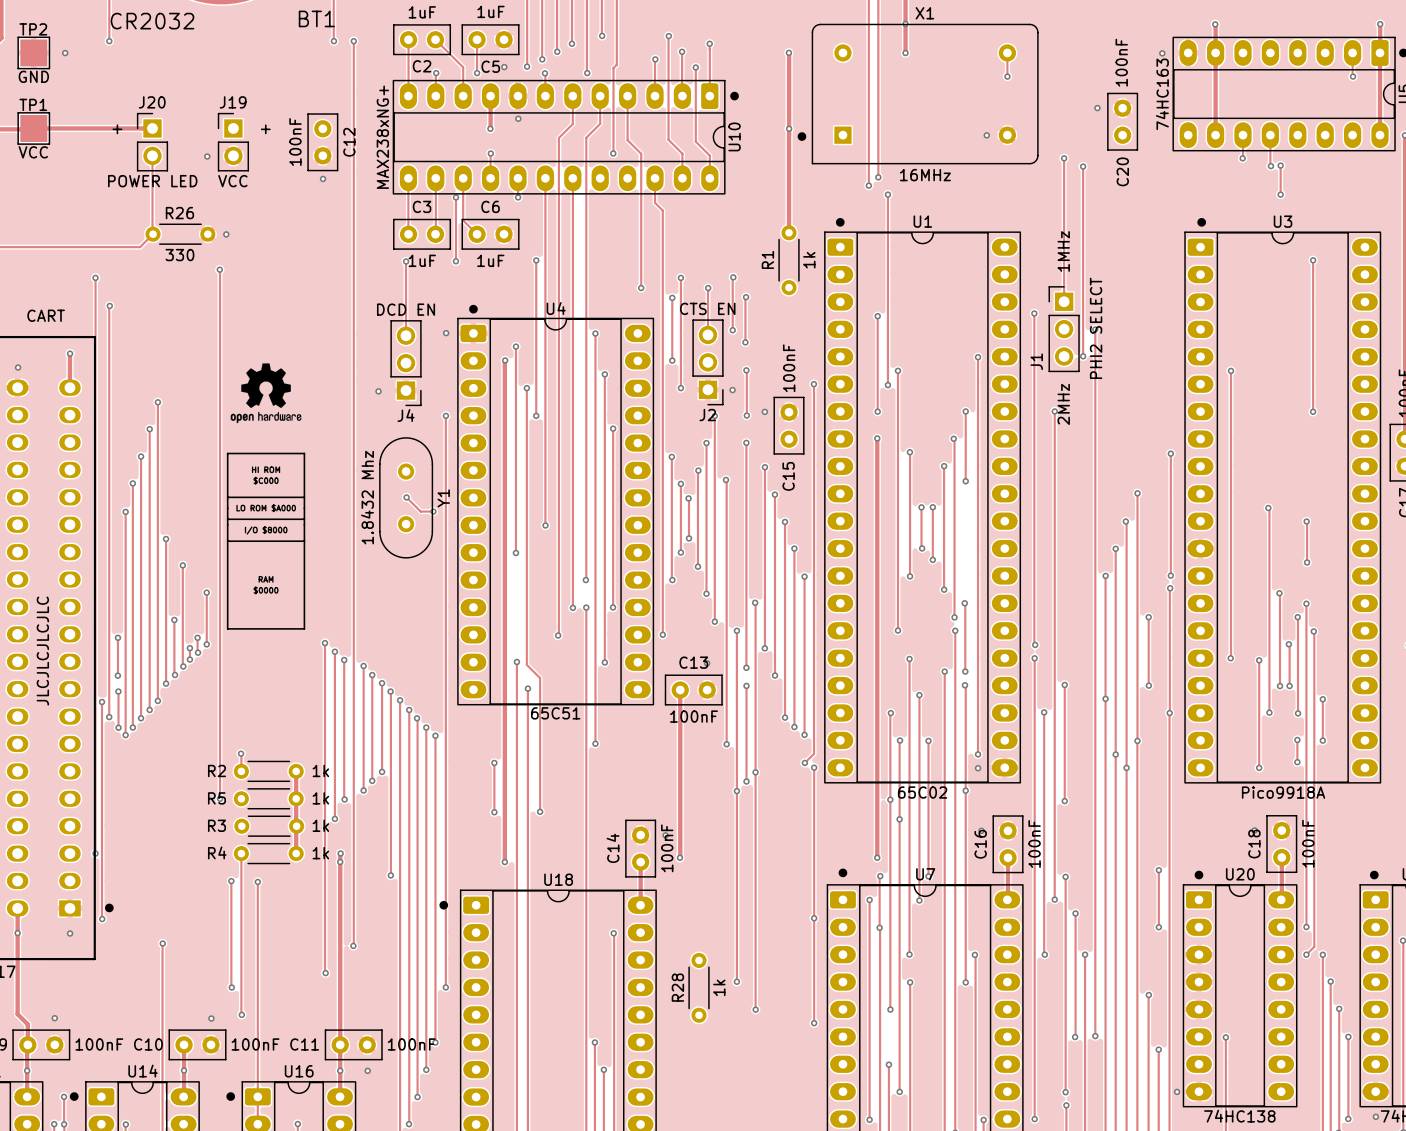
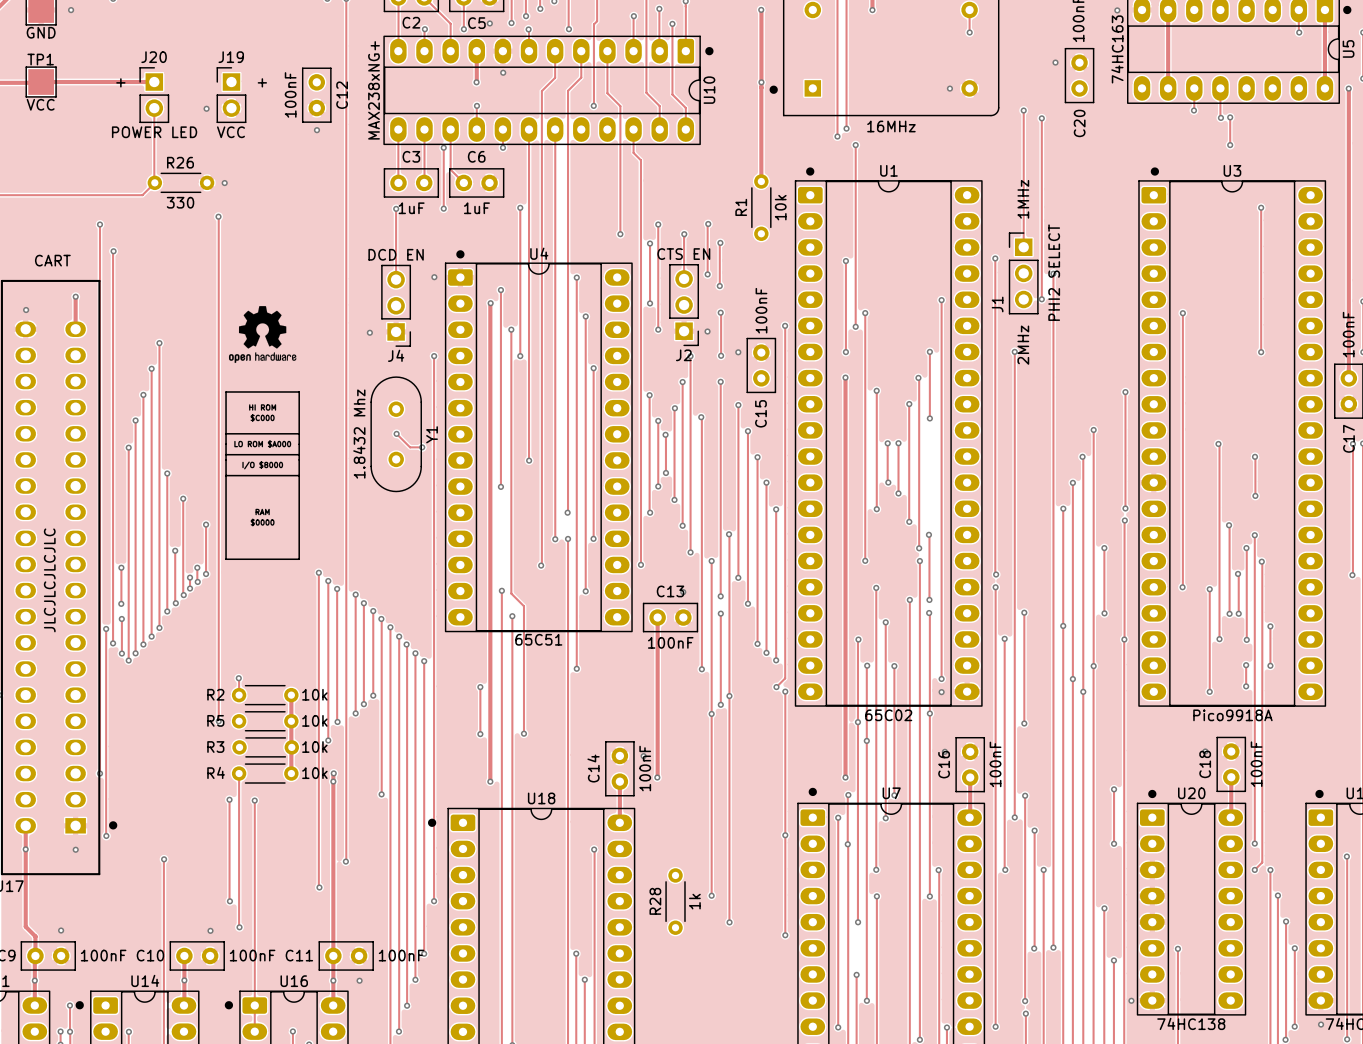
R1 value: 1k (809, 260) -> 10k (780, 207)
R2 value: 1k (320, 770) -> 10k (314, 694)
R5 value: 1k (320, 798) -> 10k (314, 720)
R3 value: 1k (320, 825) -> 10k (314, 747)
R4 value: 1k (320, 853) -> 10k (314, 773)

